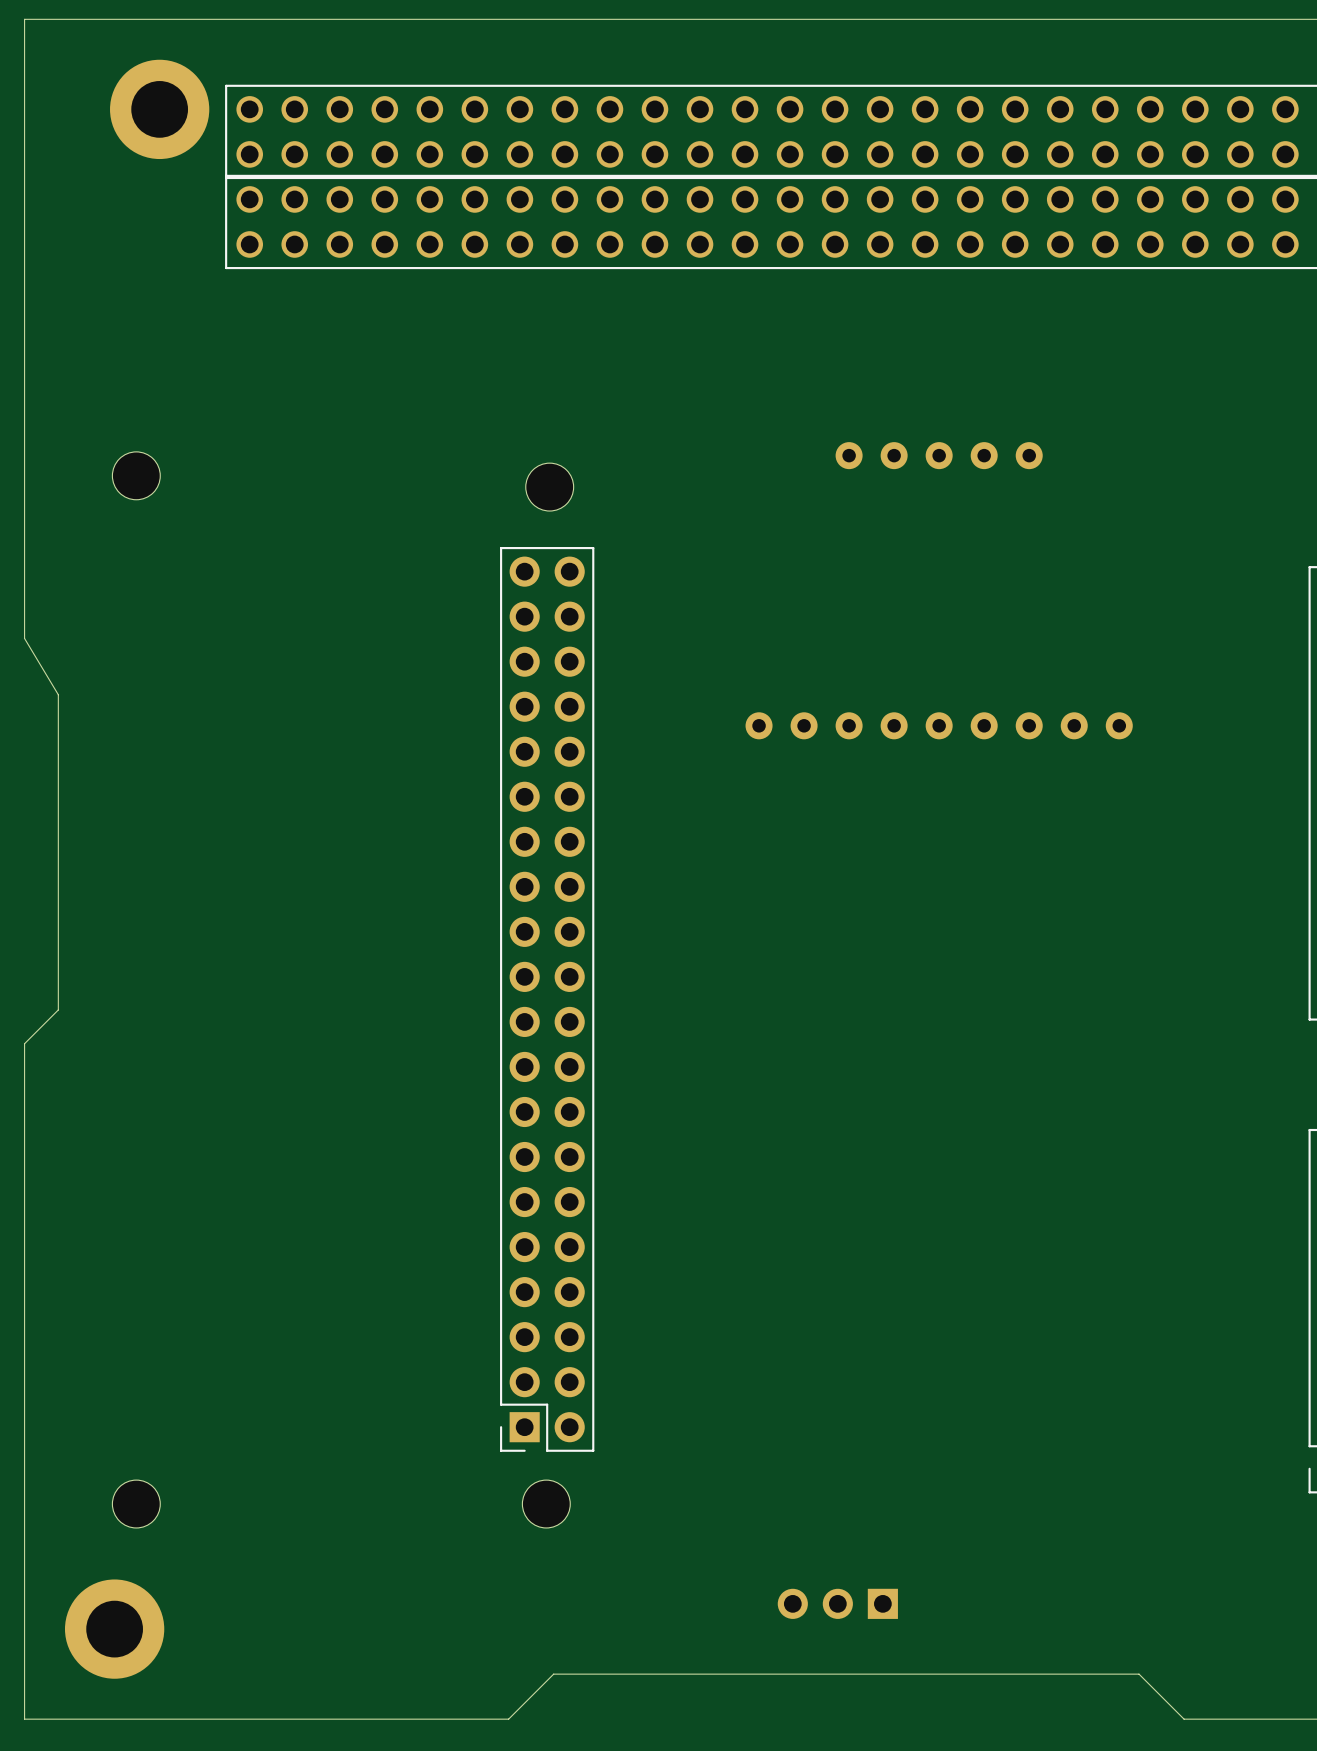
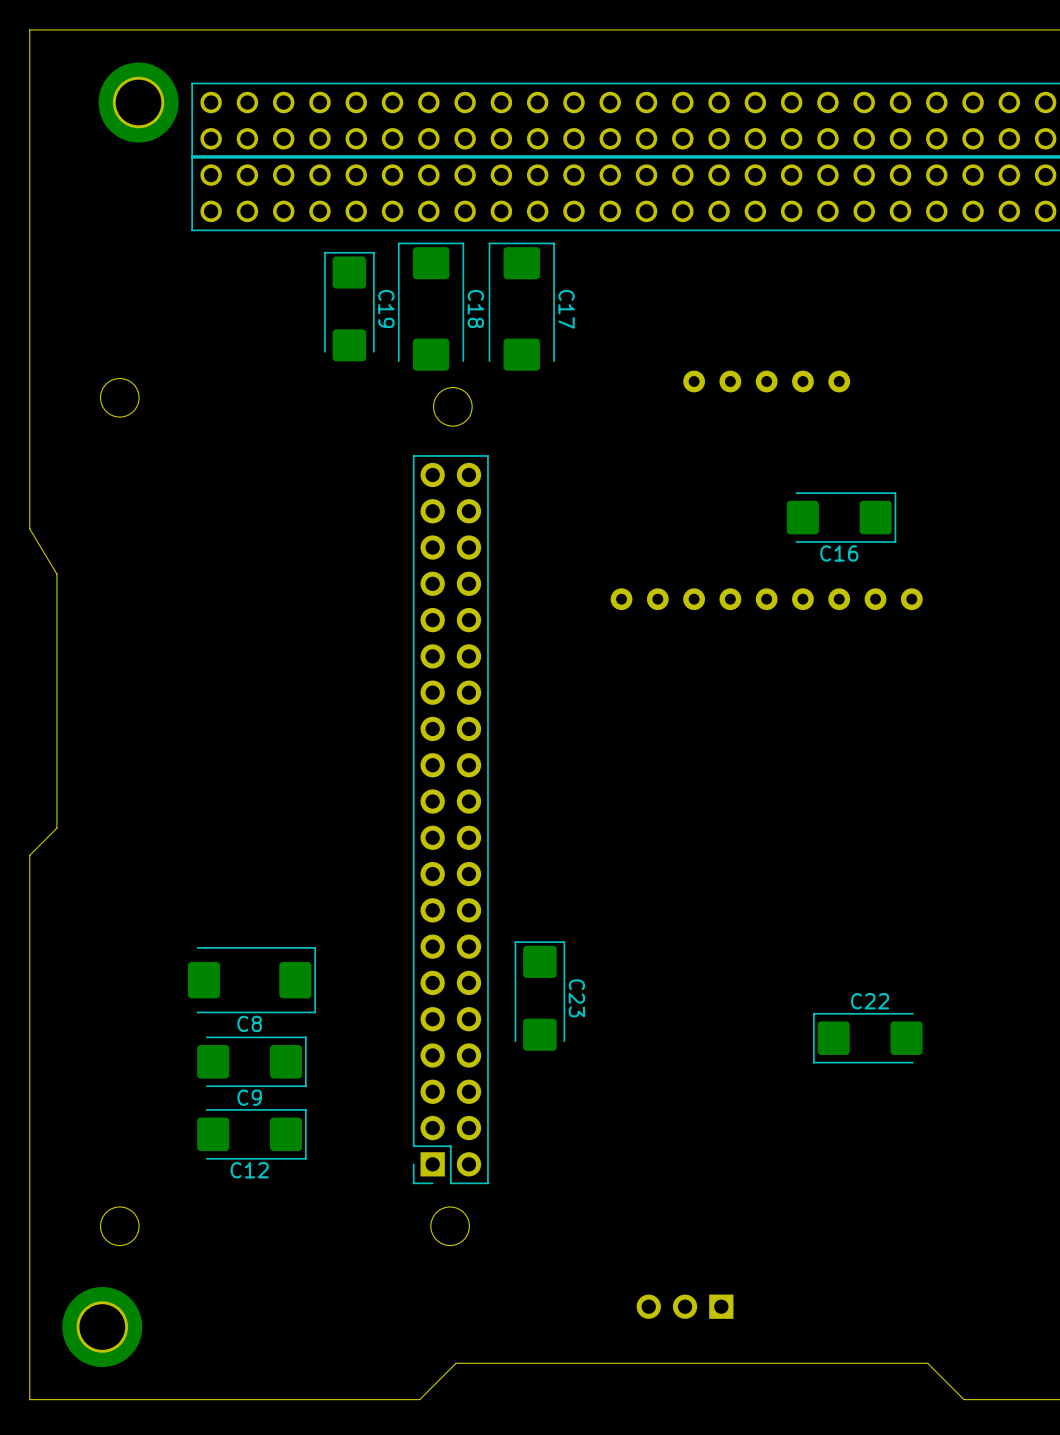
C19: none -> (349, 306)
C18: none -> (431, 306)
C17: none -> (521, 306)
C16: none -> (841, 517)
C8: none -> (251, 980)
C23: none -> (539, 996)
C22: none -> (867, 1038)
C9: none -> (251, 1061)
C12: none -> (251, 1134)

